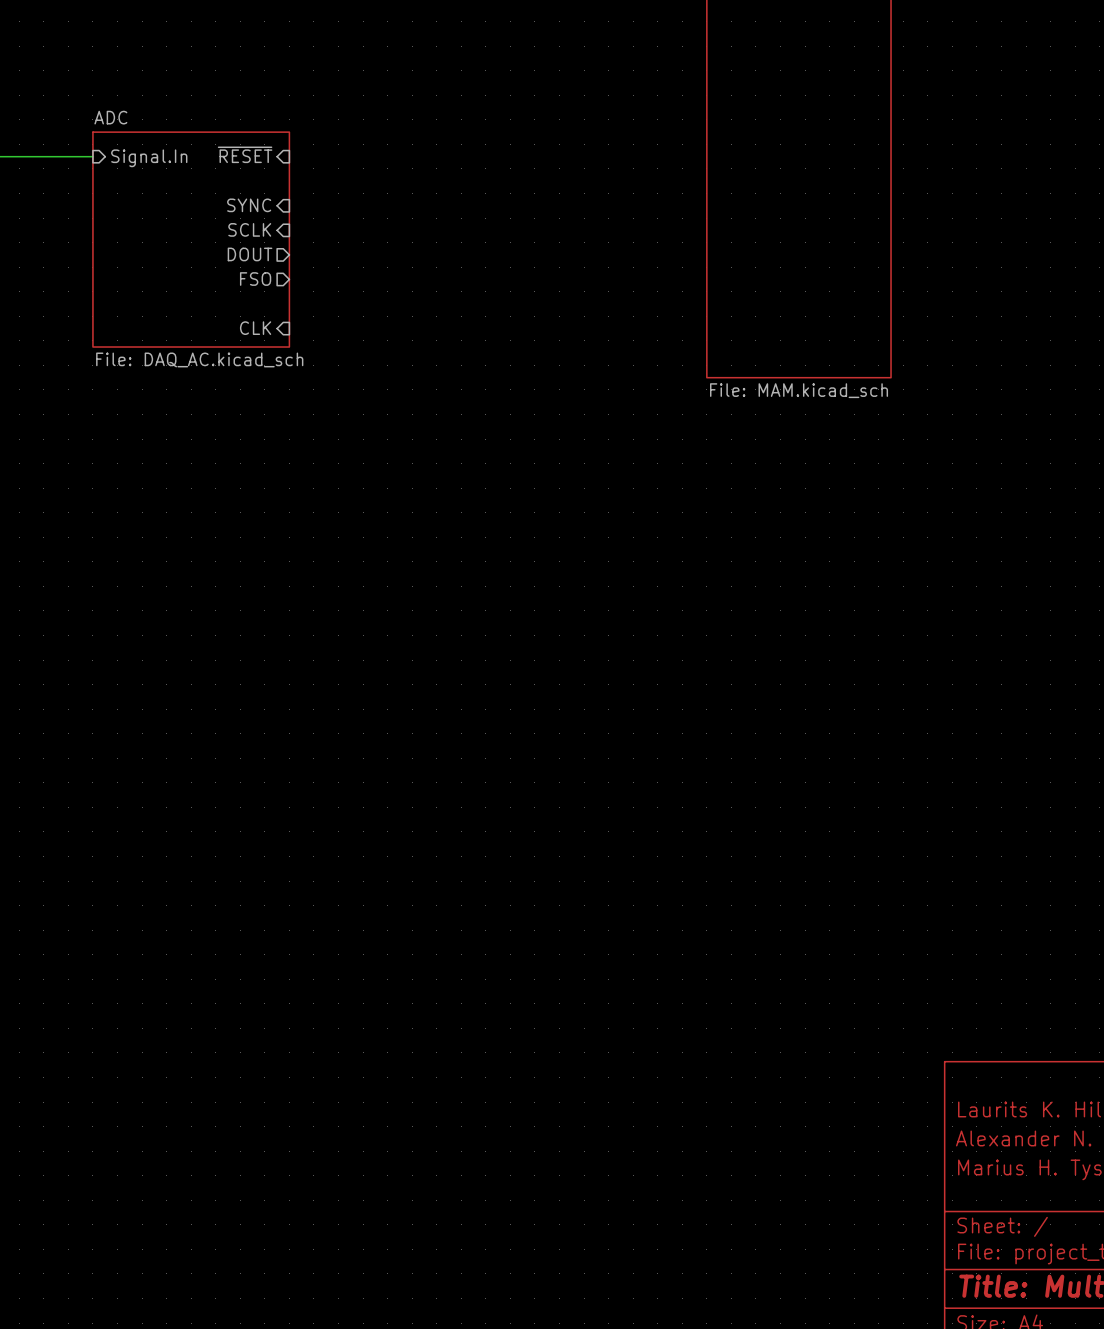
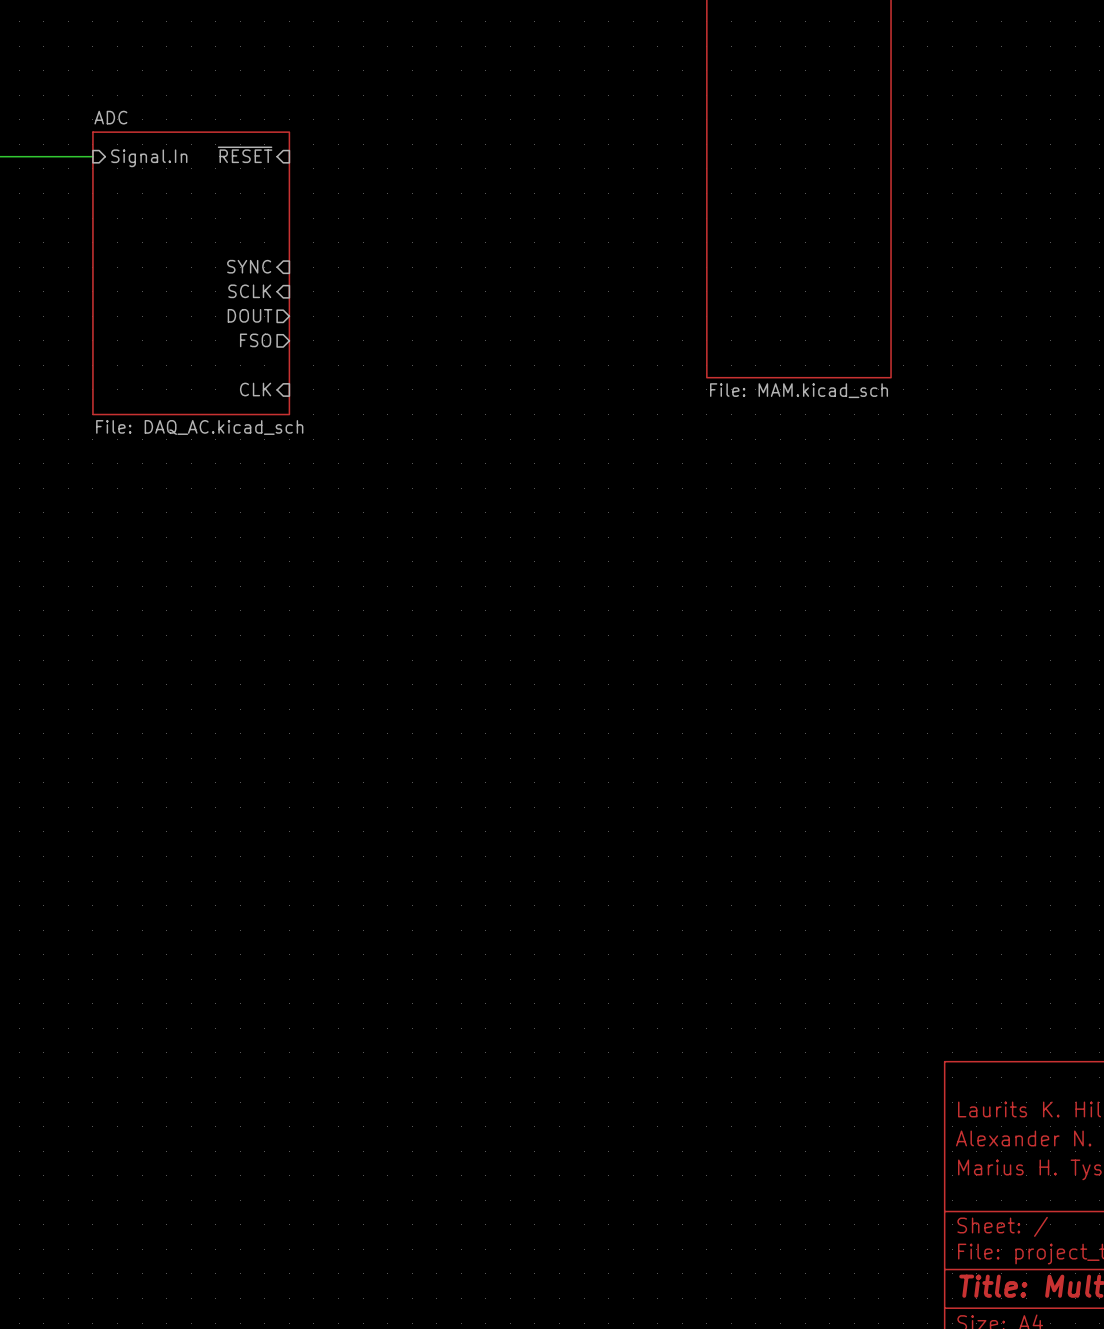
sheet pin position: SYNC (249, 205) -> SYNC (249, 266)
sheet pin position: SCLK (249, 229) -> SCLK (249, 291)
sheet ADC: File: DAQ_AC.kicad_sch (191, 239) -> none
sheet pin position: DOUT (250, 254) -> DOUT (250, 315)
sheet ADC: none -> File: DAQ_AC.kicad_sch (191, 273)
sheet pin position: FSO (255, 279) -> FSO (255, 340)
sheet pin position: CLK (255, 328) -> CLK (255, 389)

